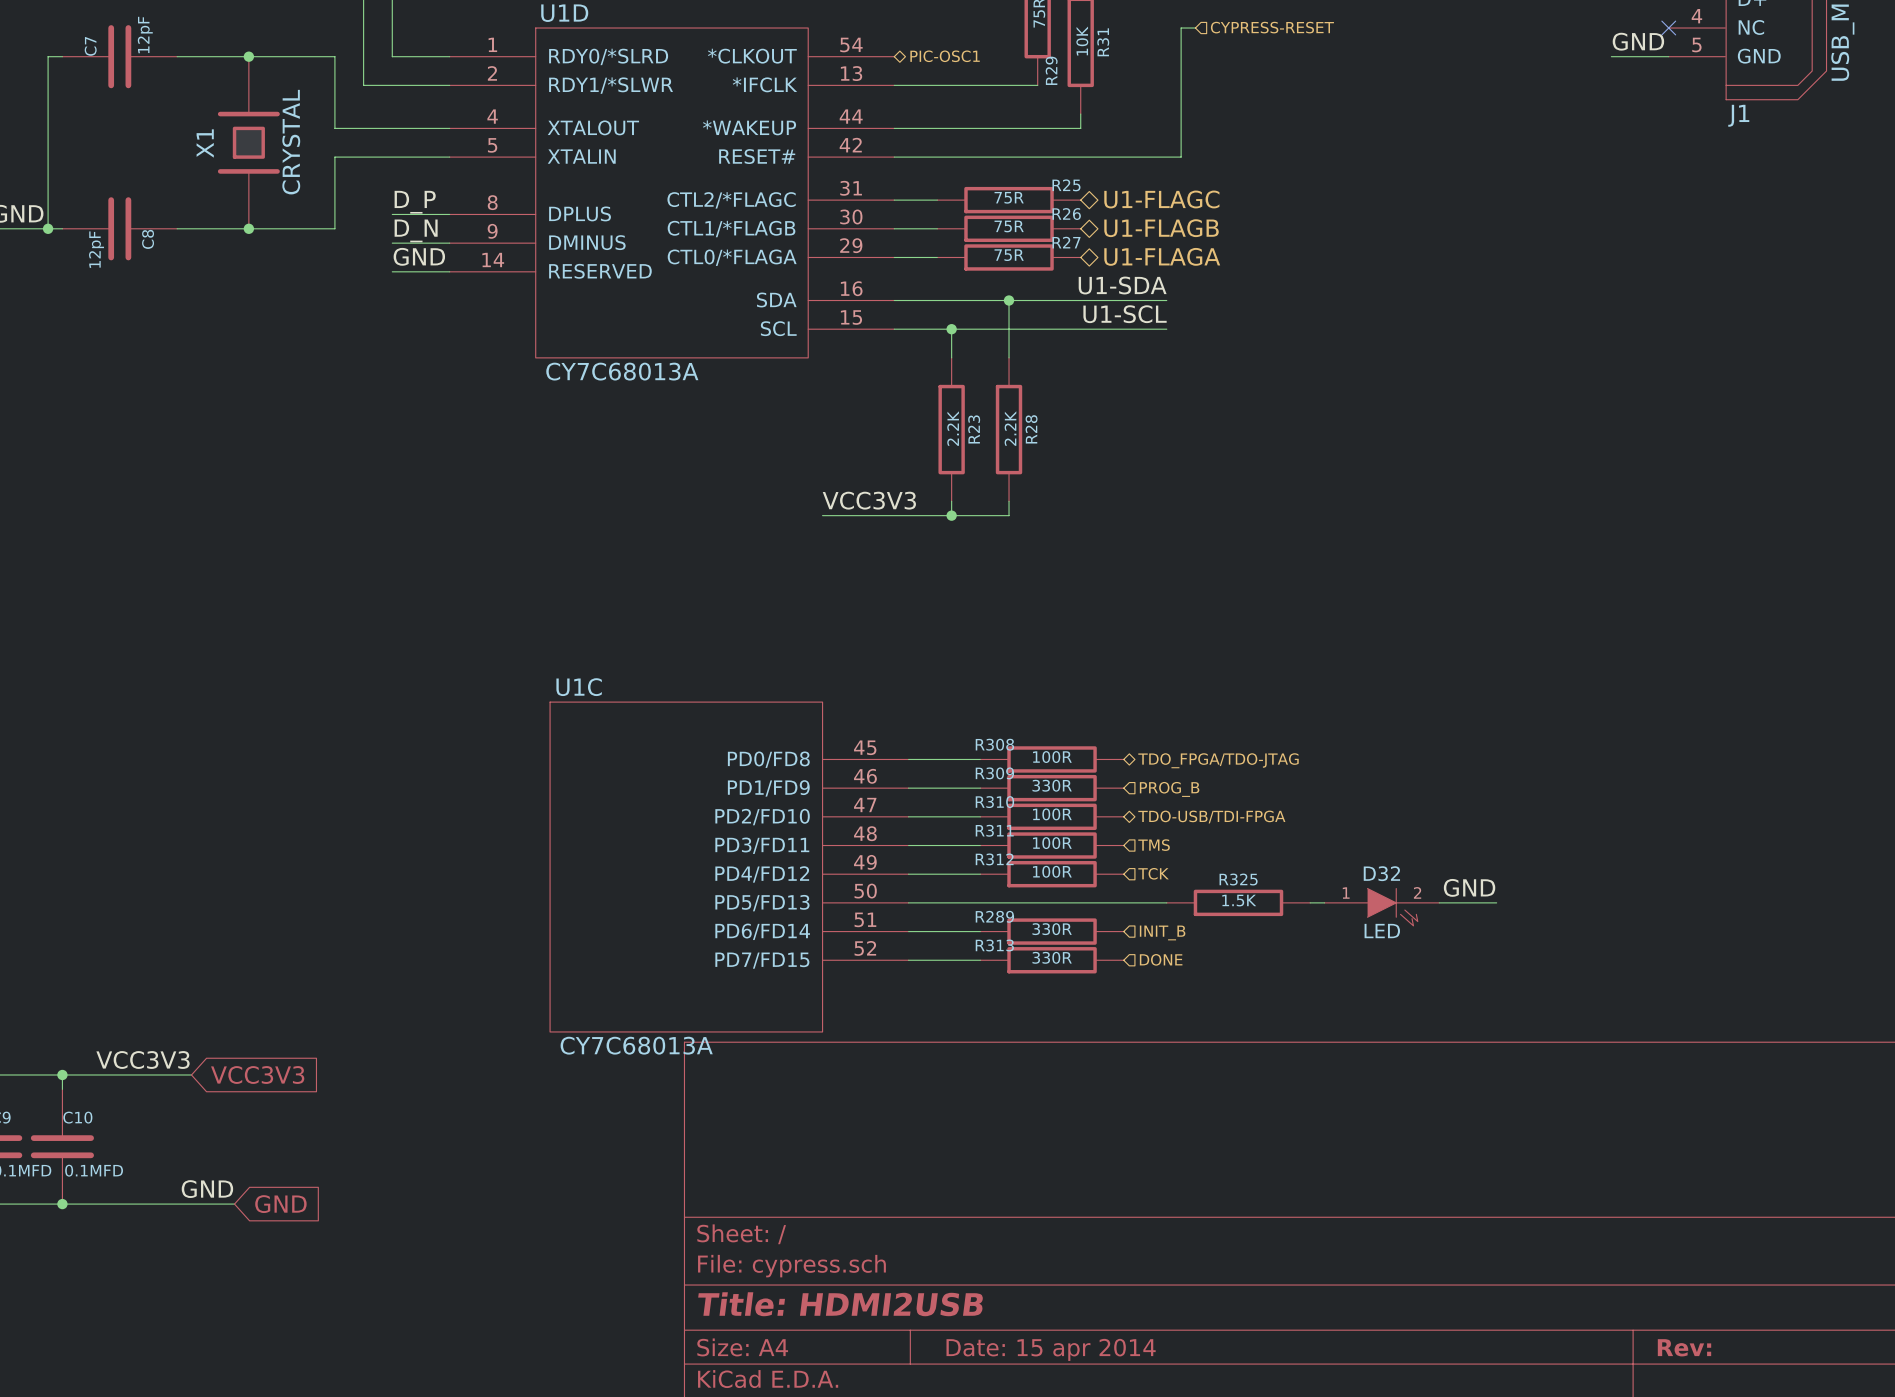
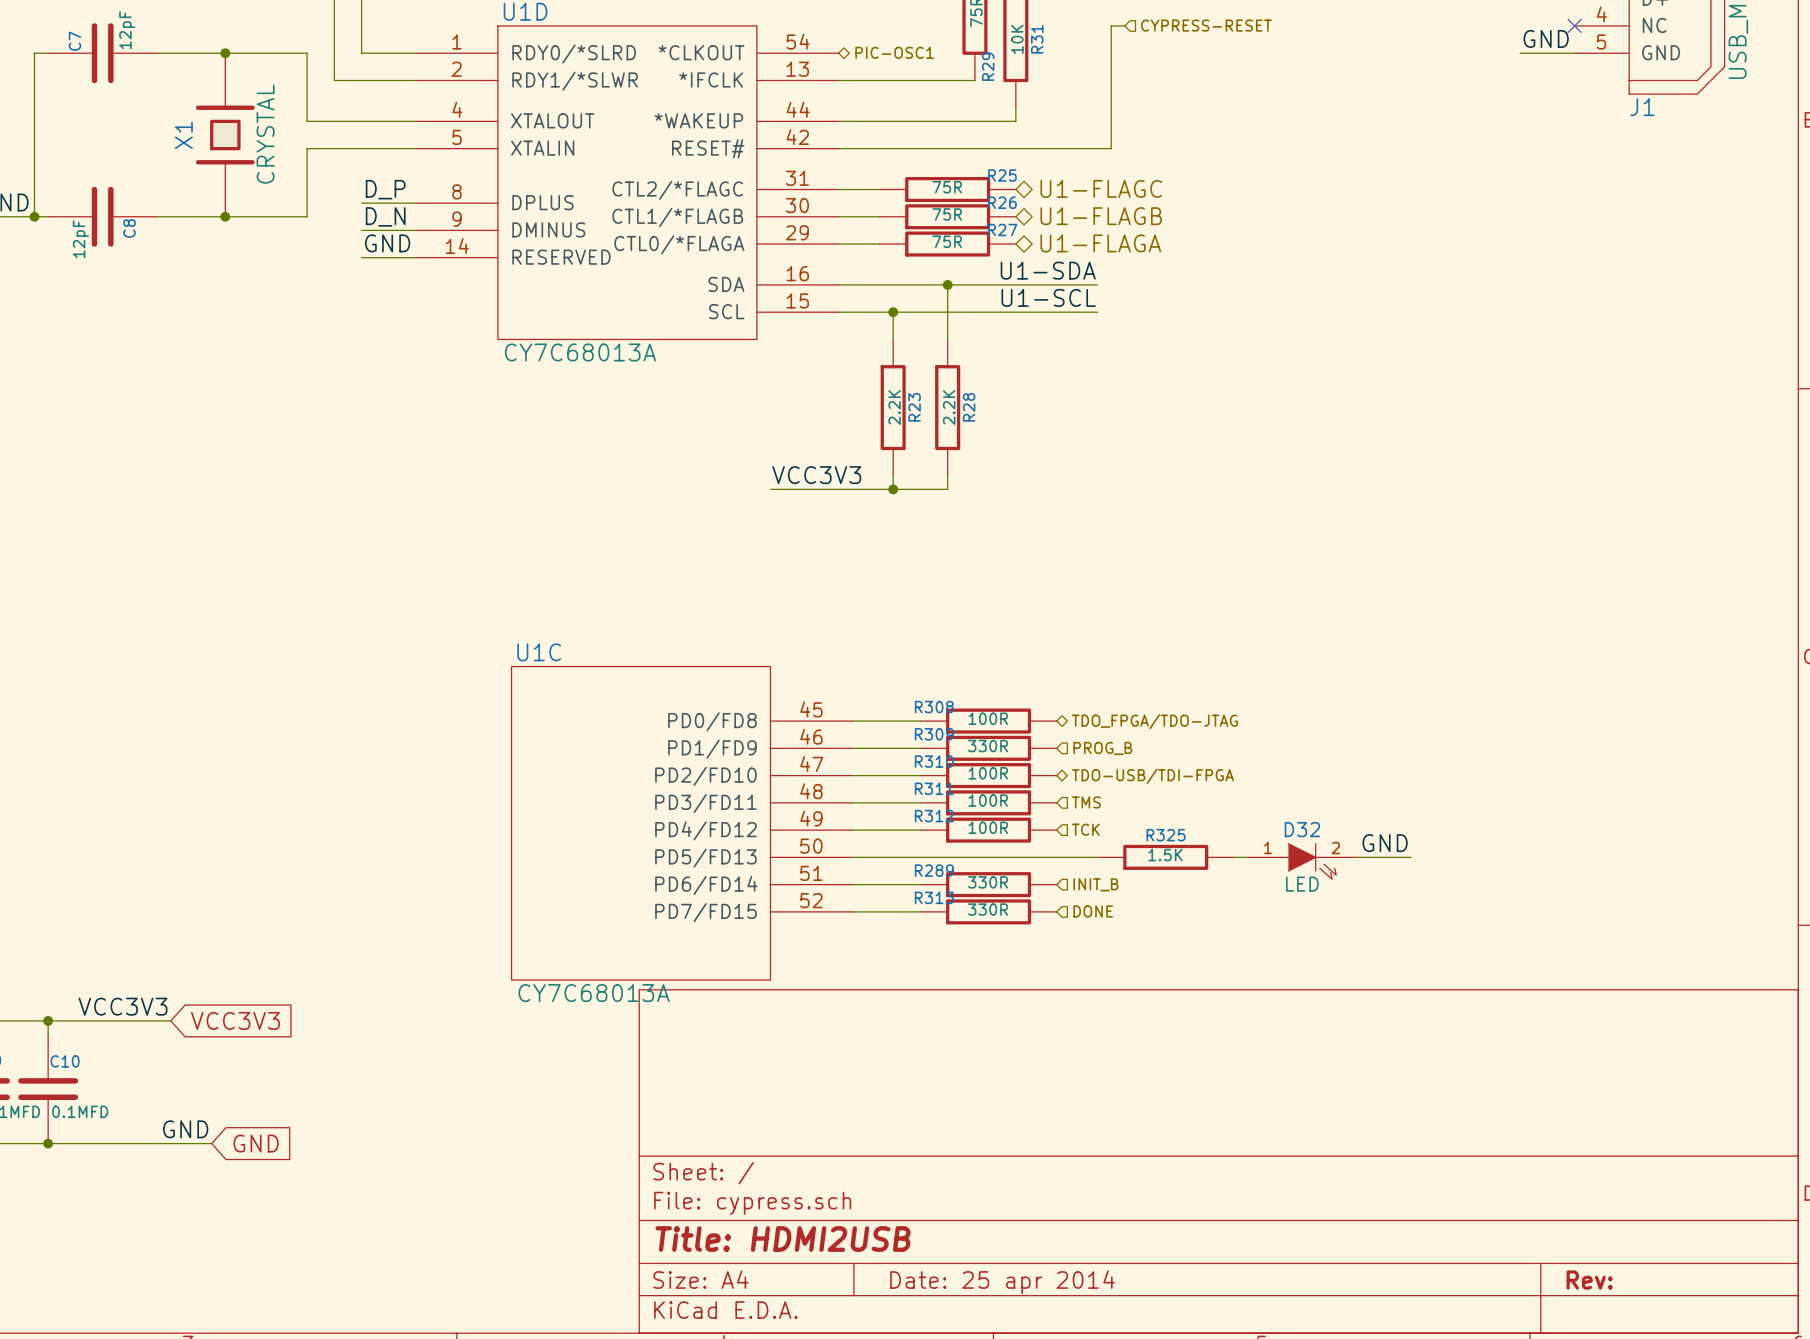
title block: Date: 15 apr 2014 (1051, 1349) -> Date: 25 apr 2014 (1002, 1282)

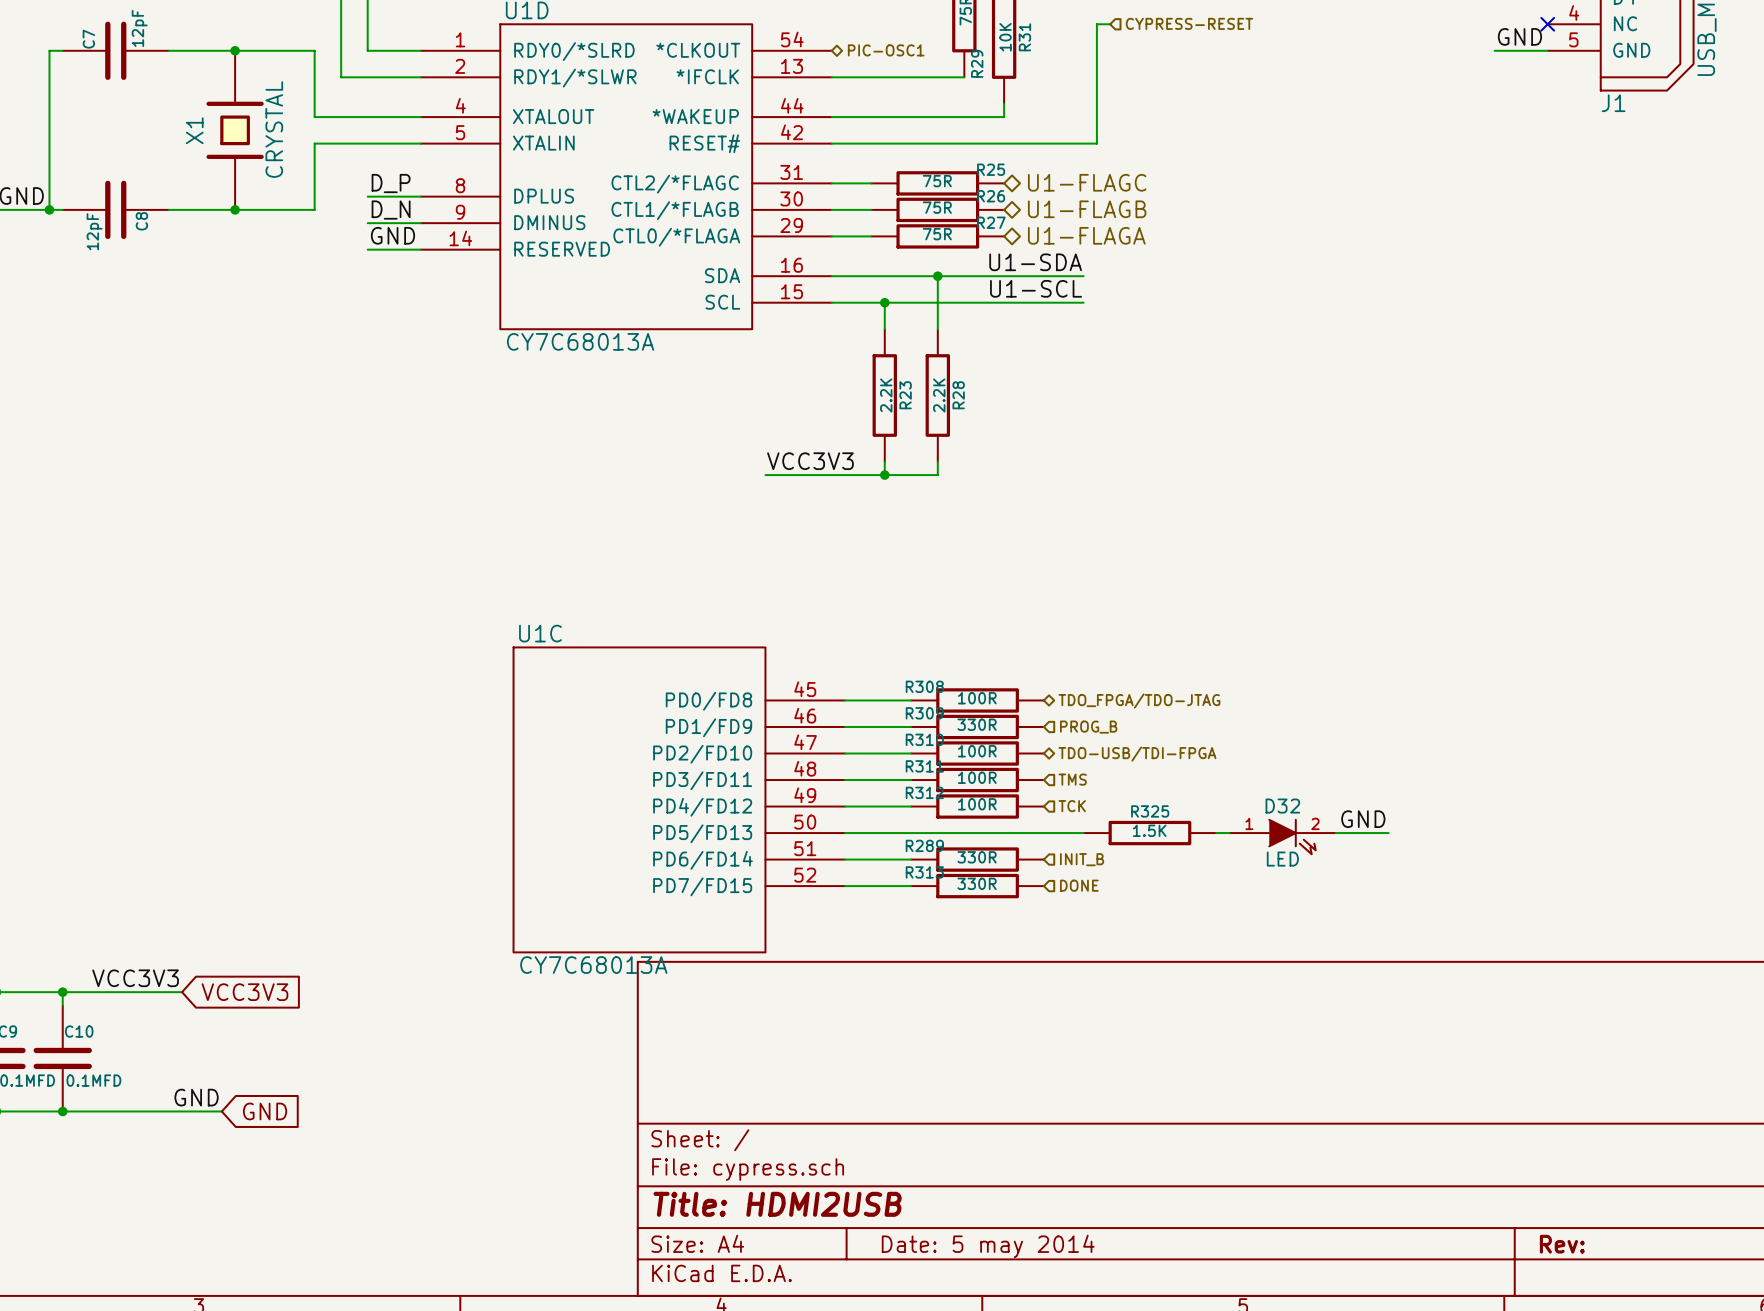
title block: Date: 25 apr 2014 (1002, 1282) -> Date: 5 may 2014 (988, 1246)

